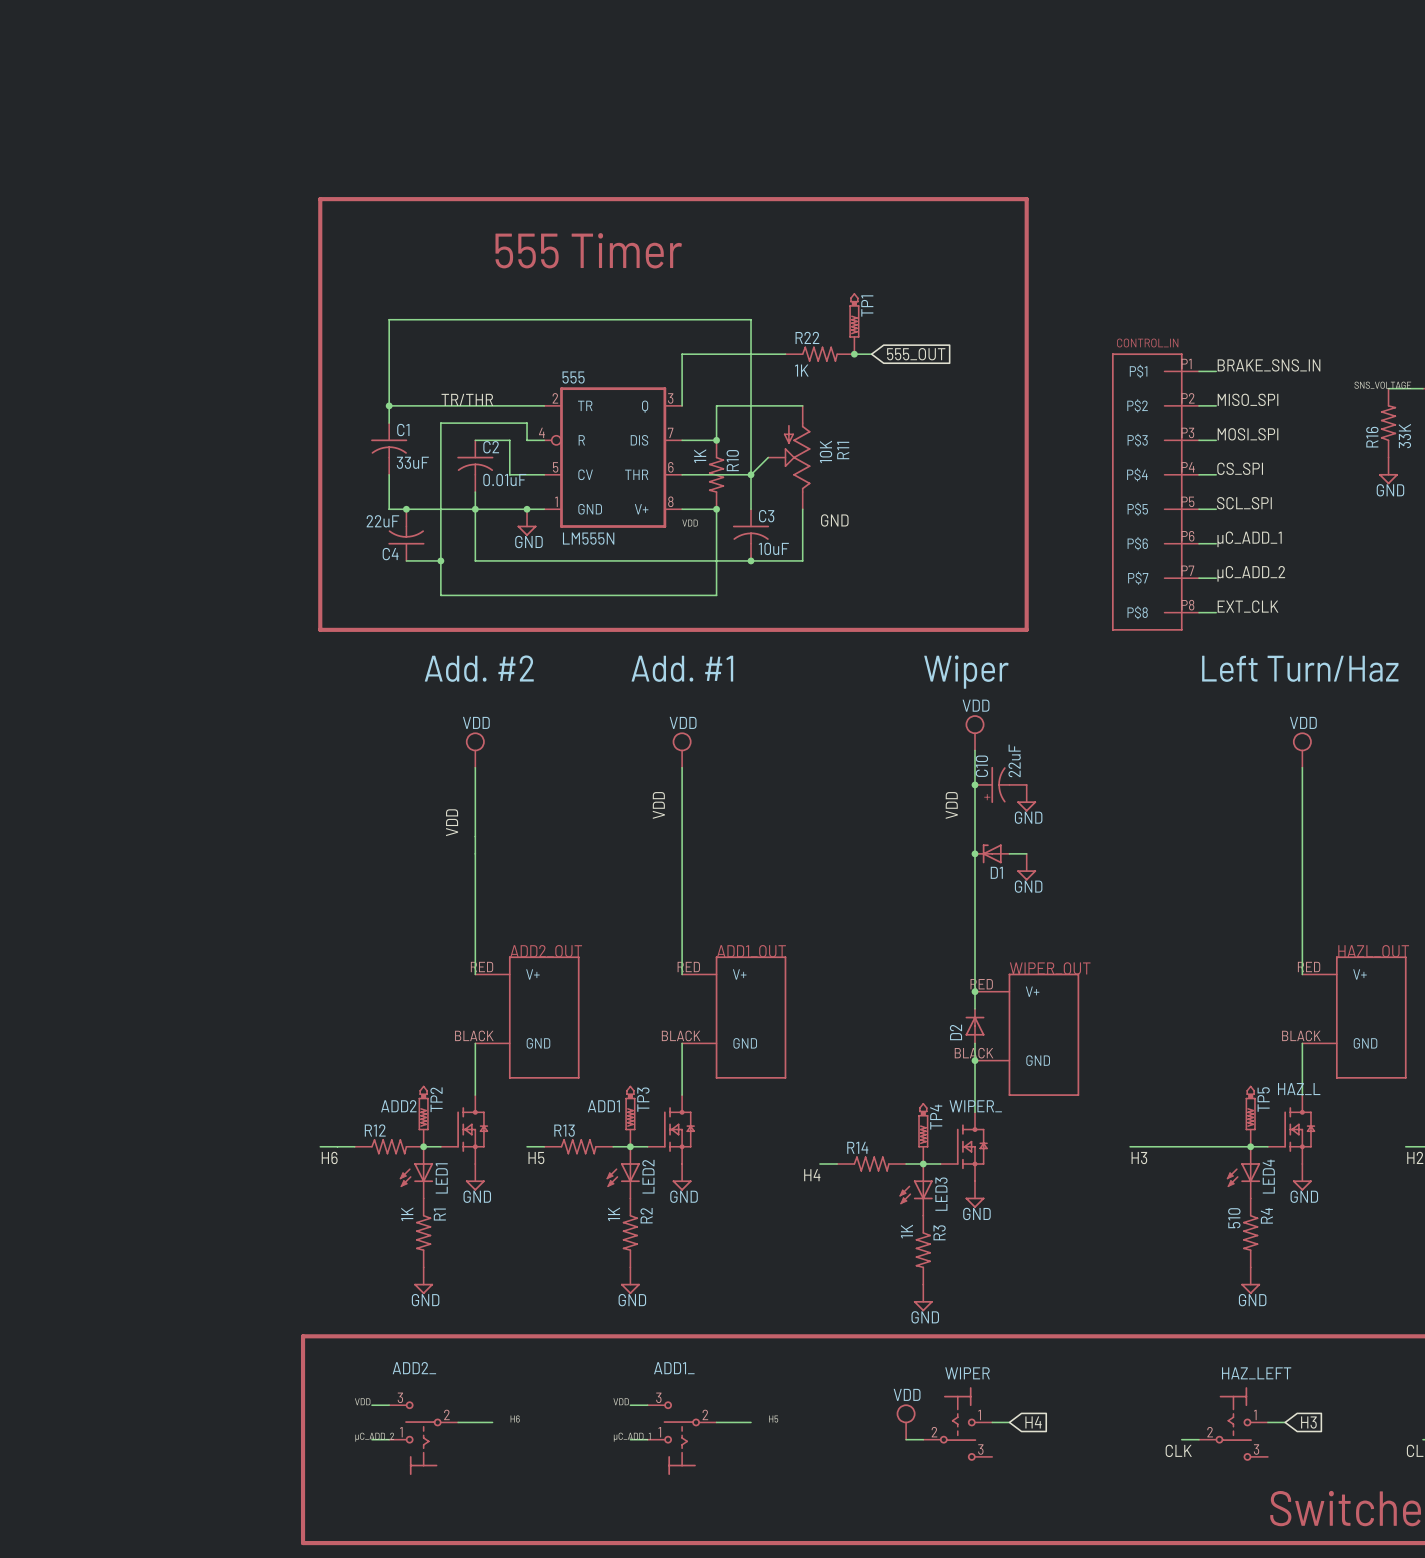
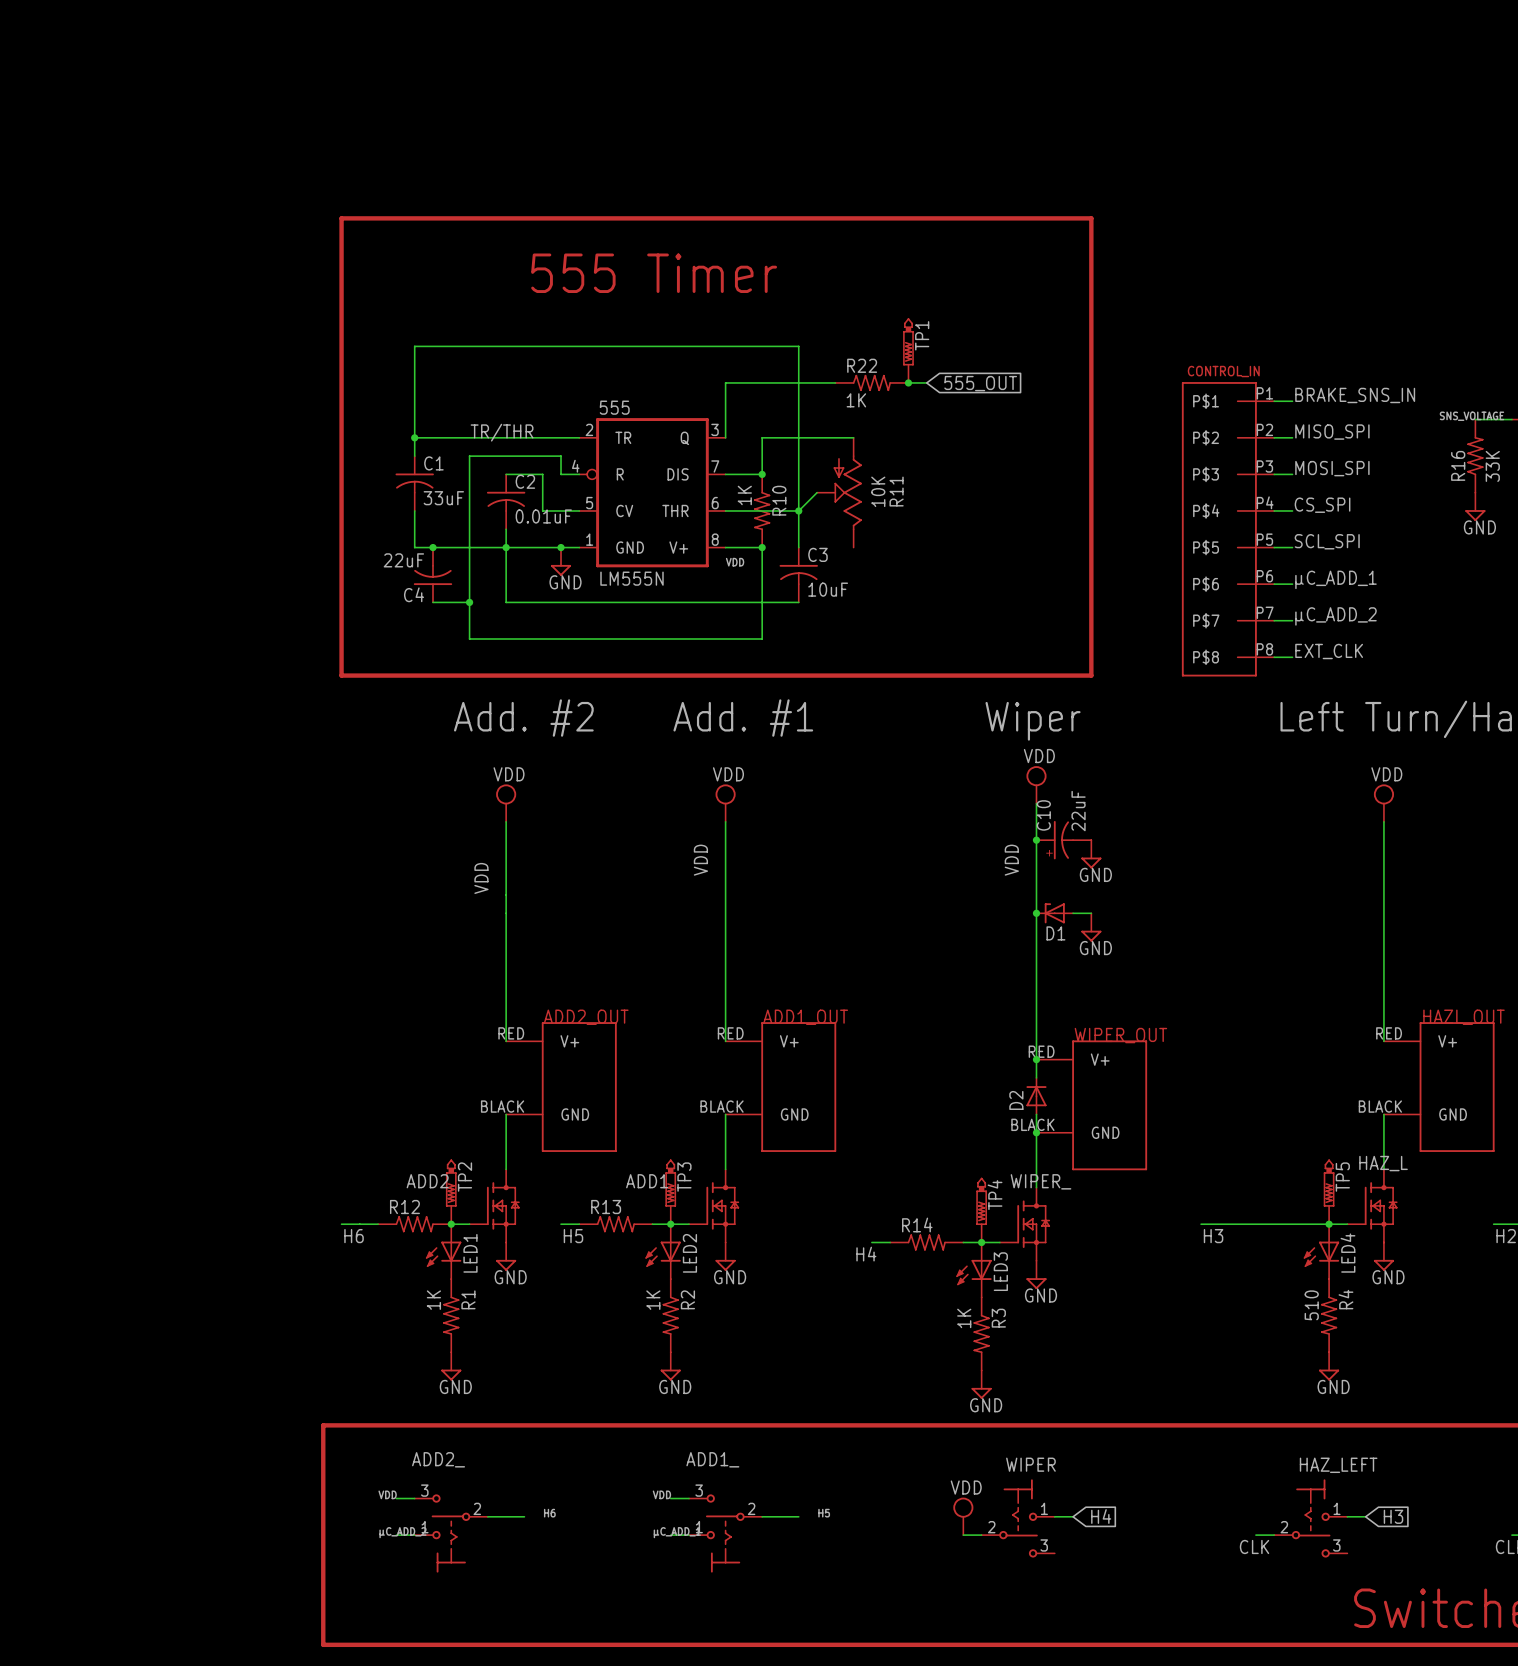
wire: (802, 509) (802, 560) (751, 560) -> none
label: GND (834, 520) -> none
junction: (751, 560) -> none

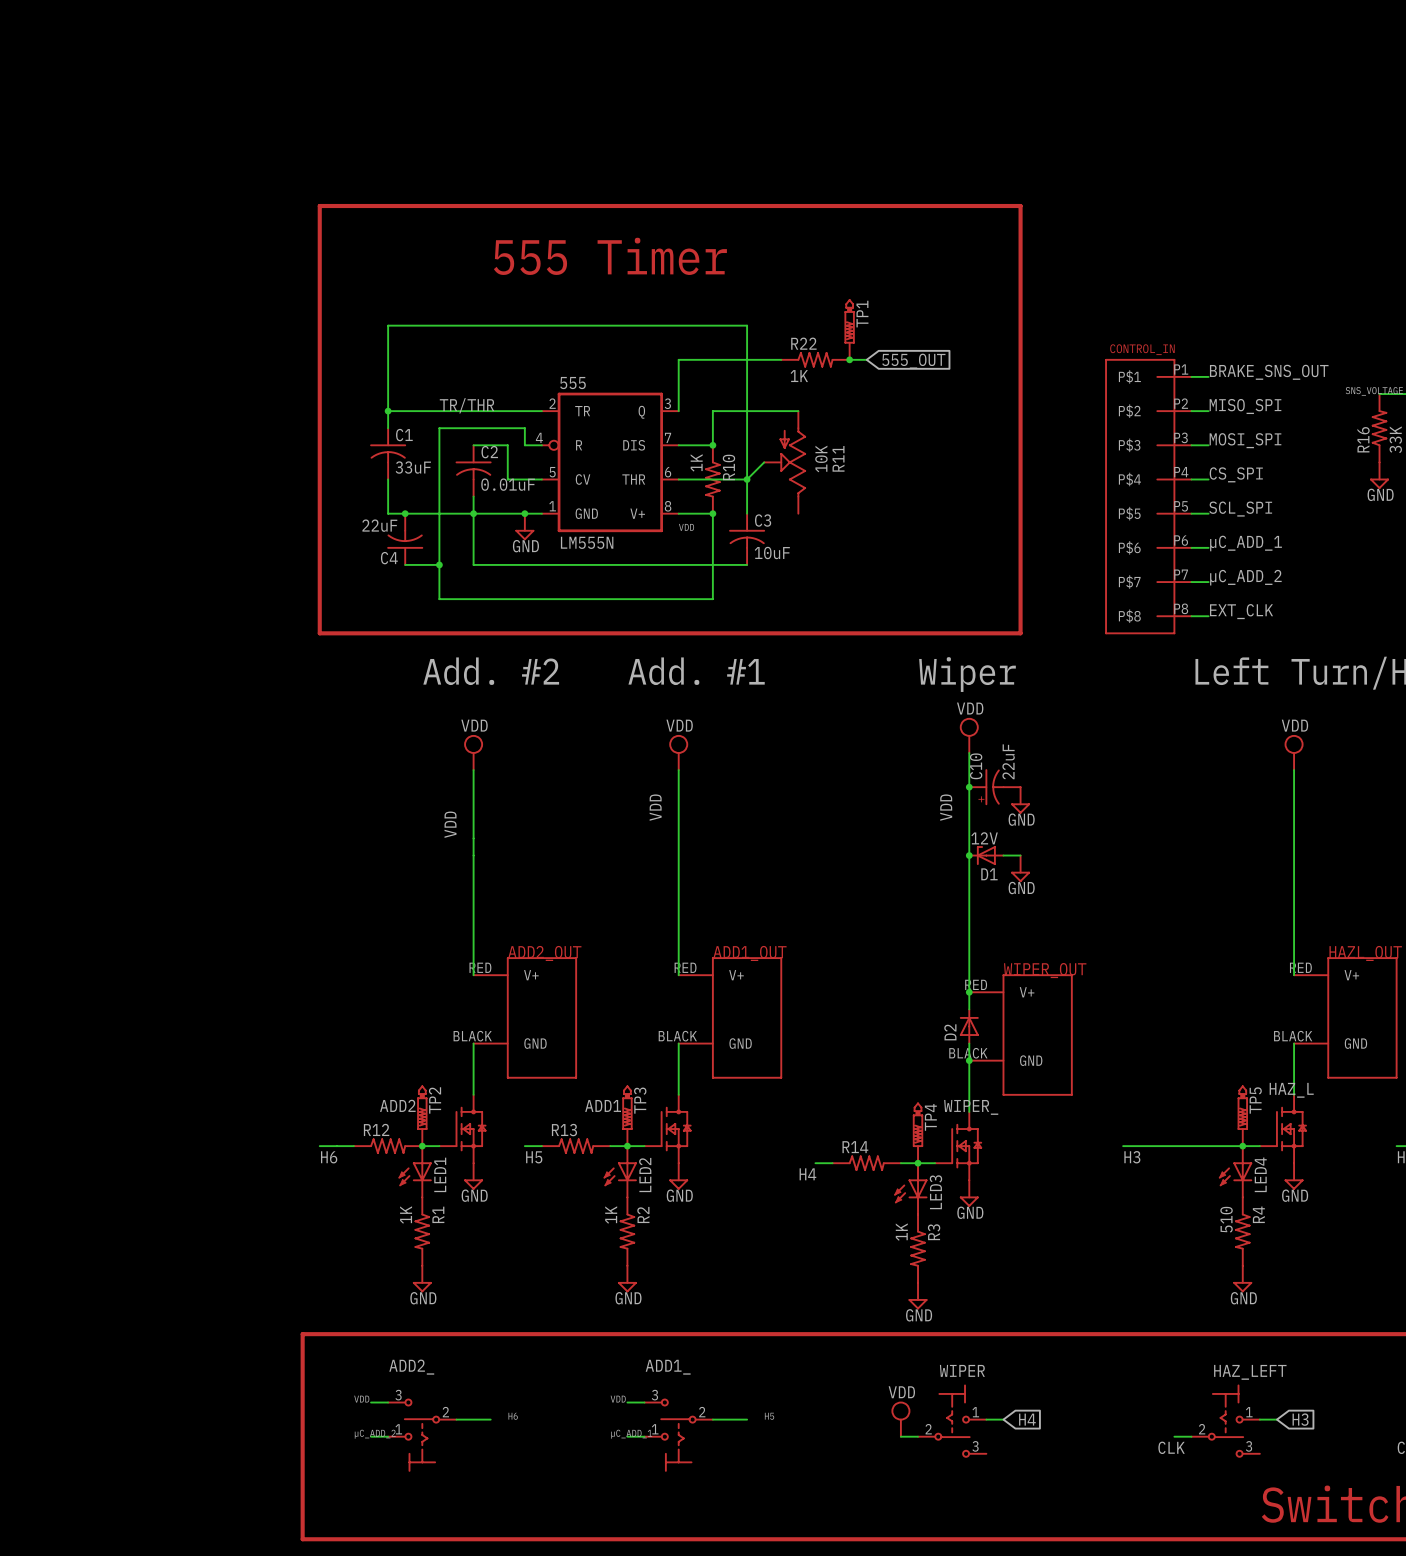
label: BRAKE_SNS_IN (1355, 395) -> BRAKE_SNS_OUT (1269, 372)
D1 value: none -> 12V (984, 838)

